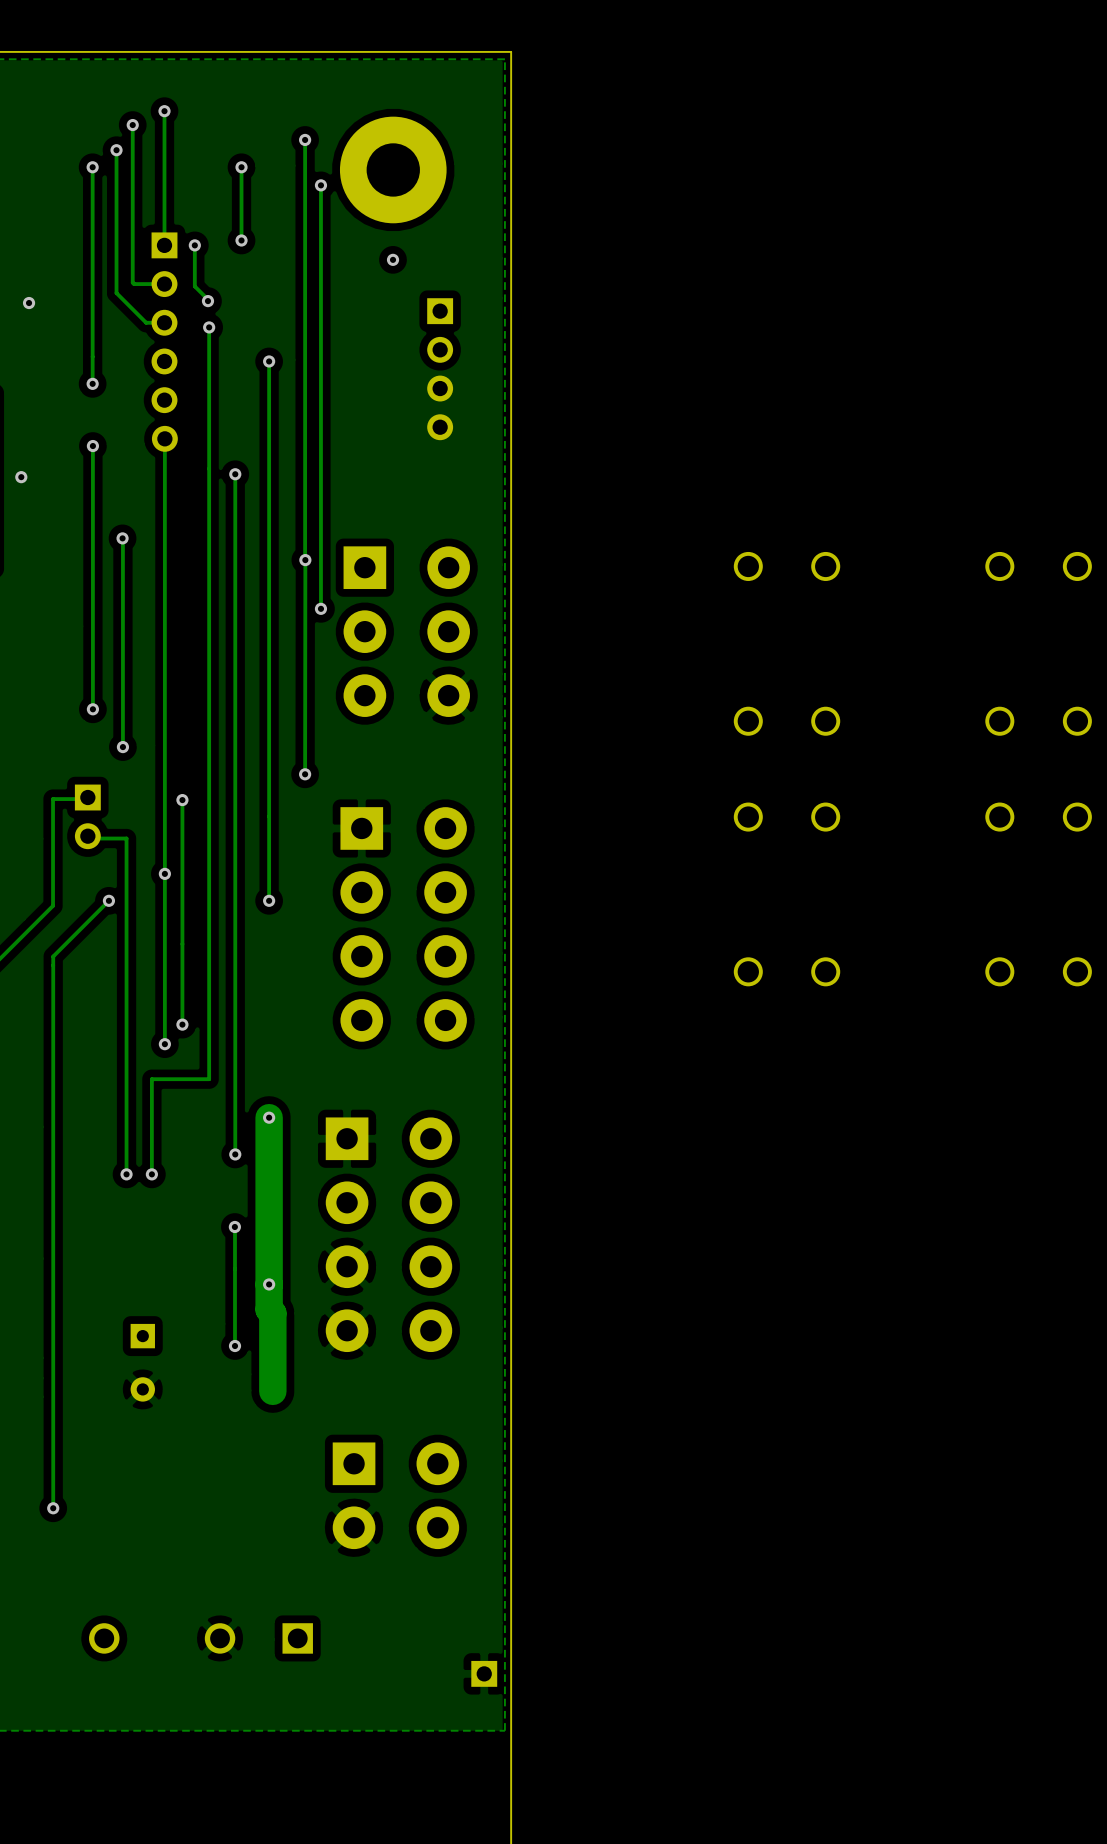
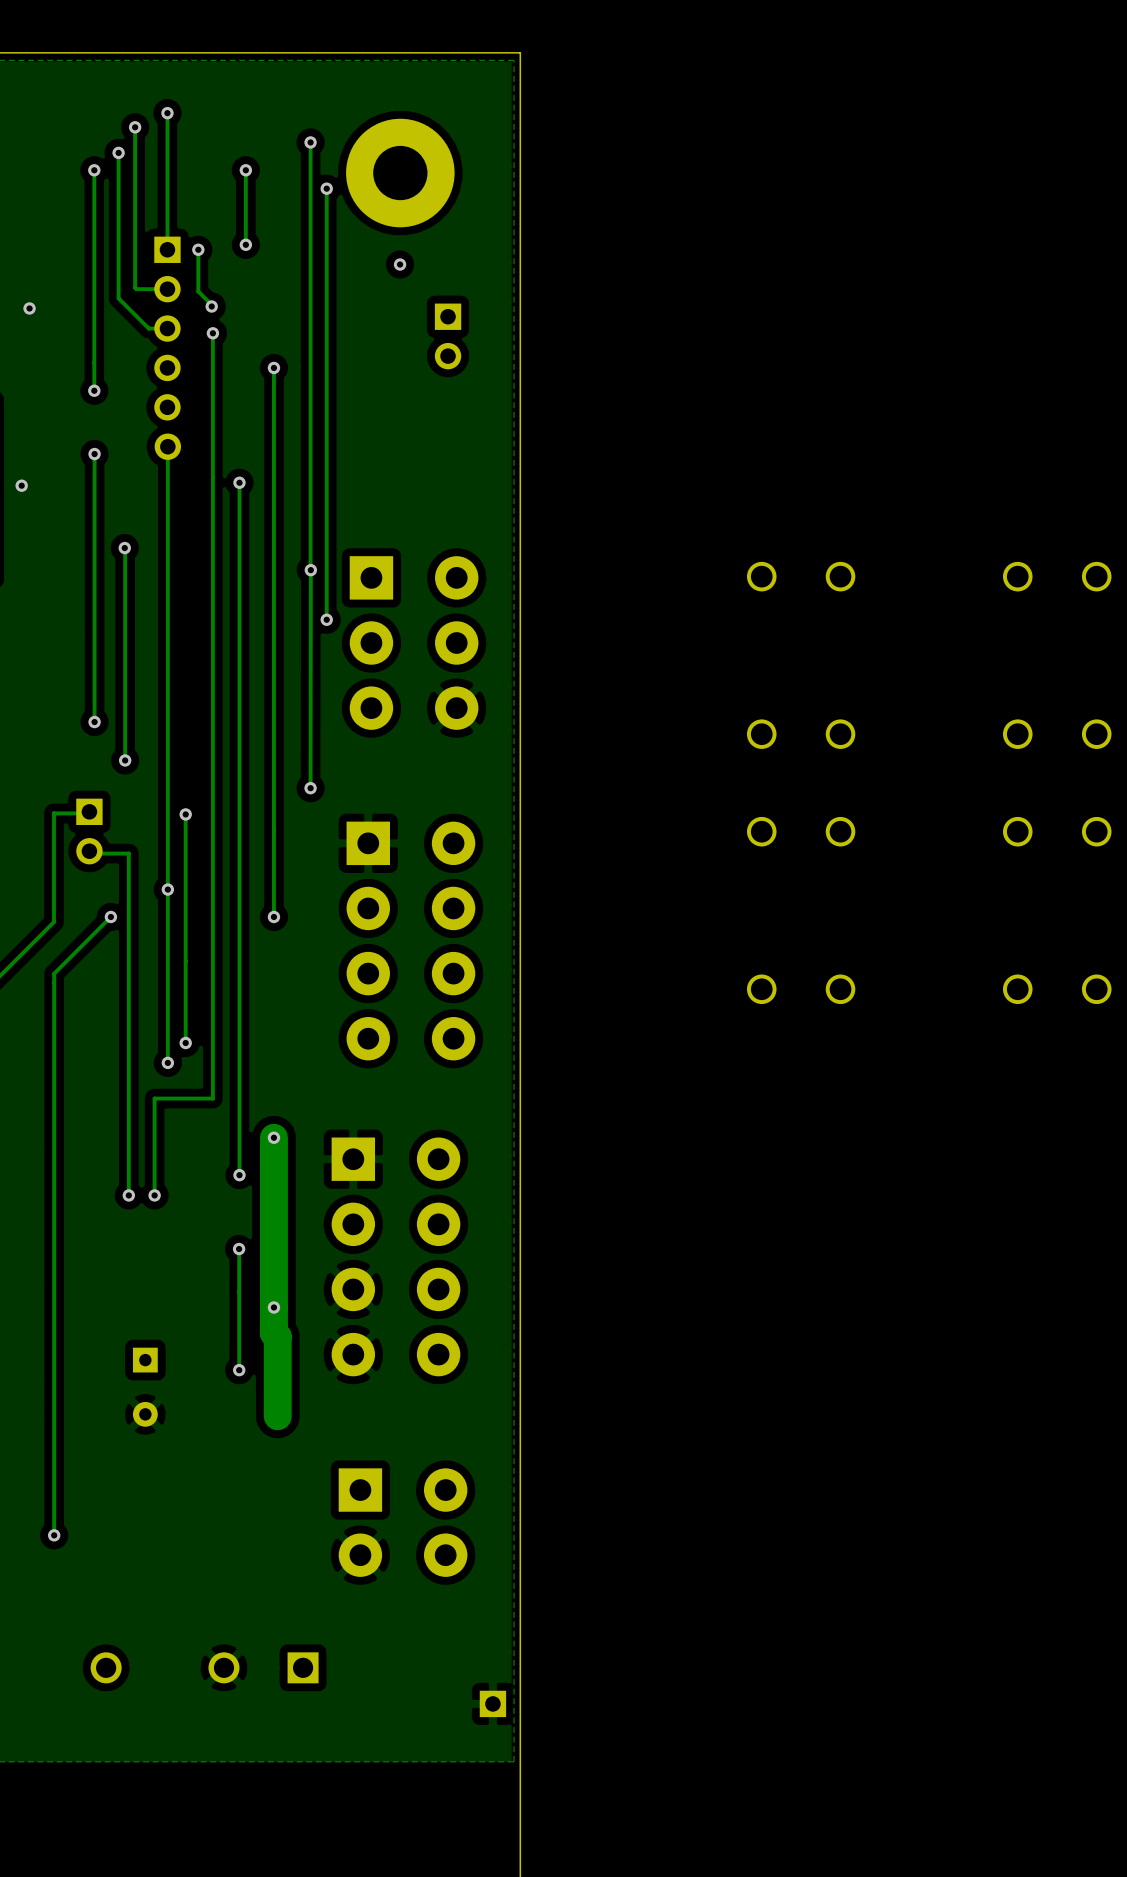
part: (440, 369) -> none

